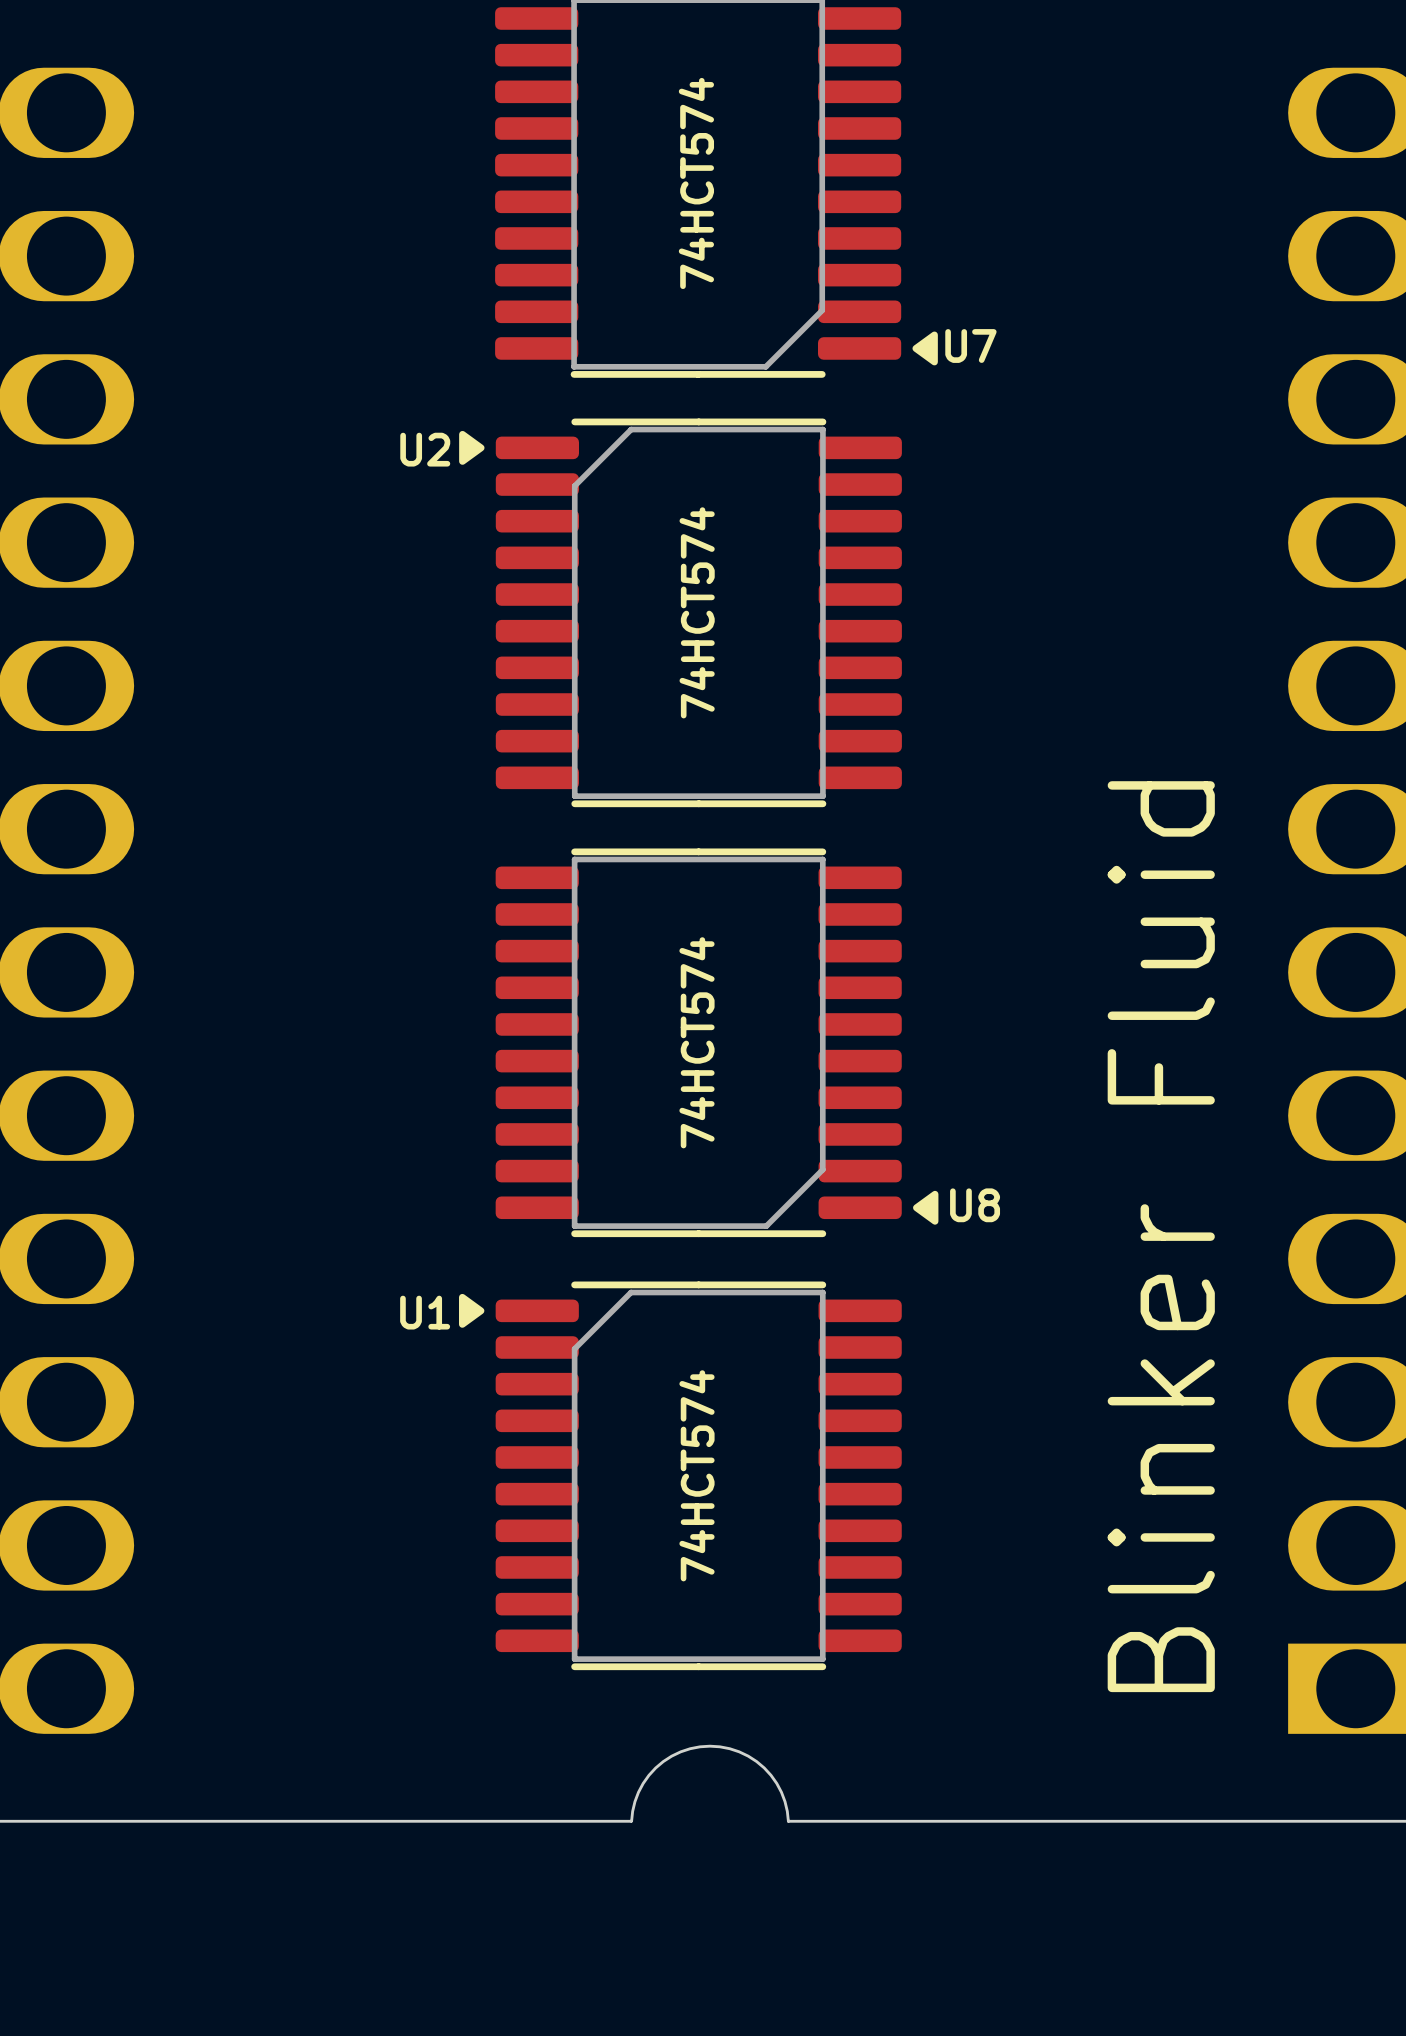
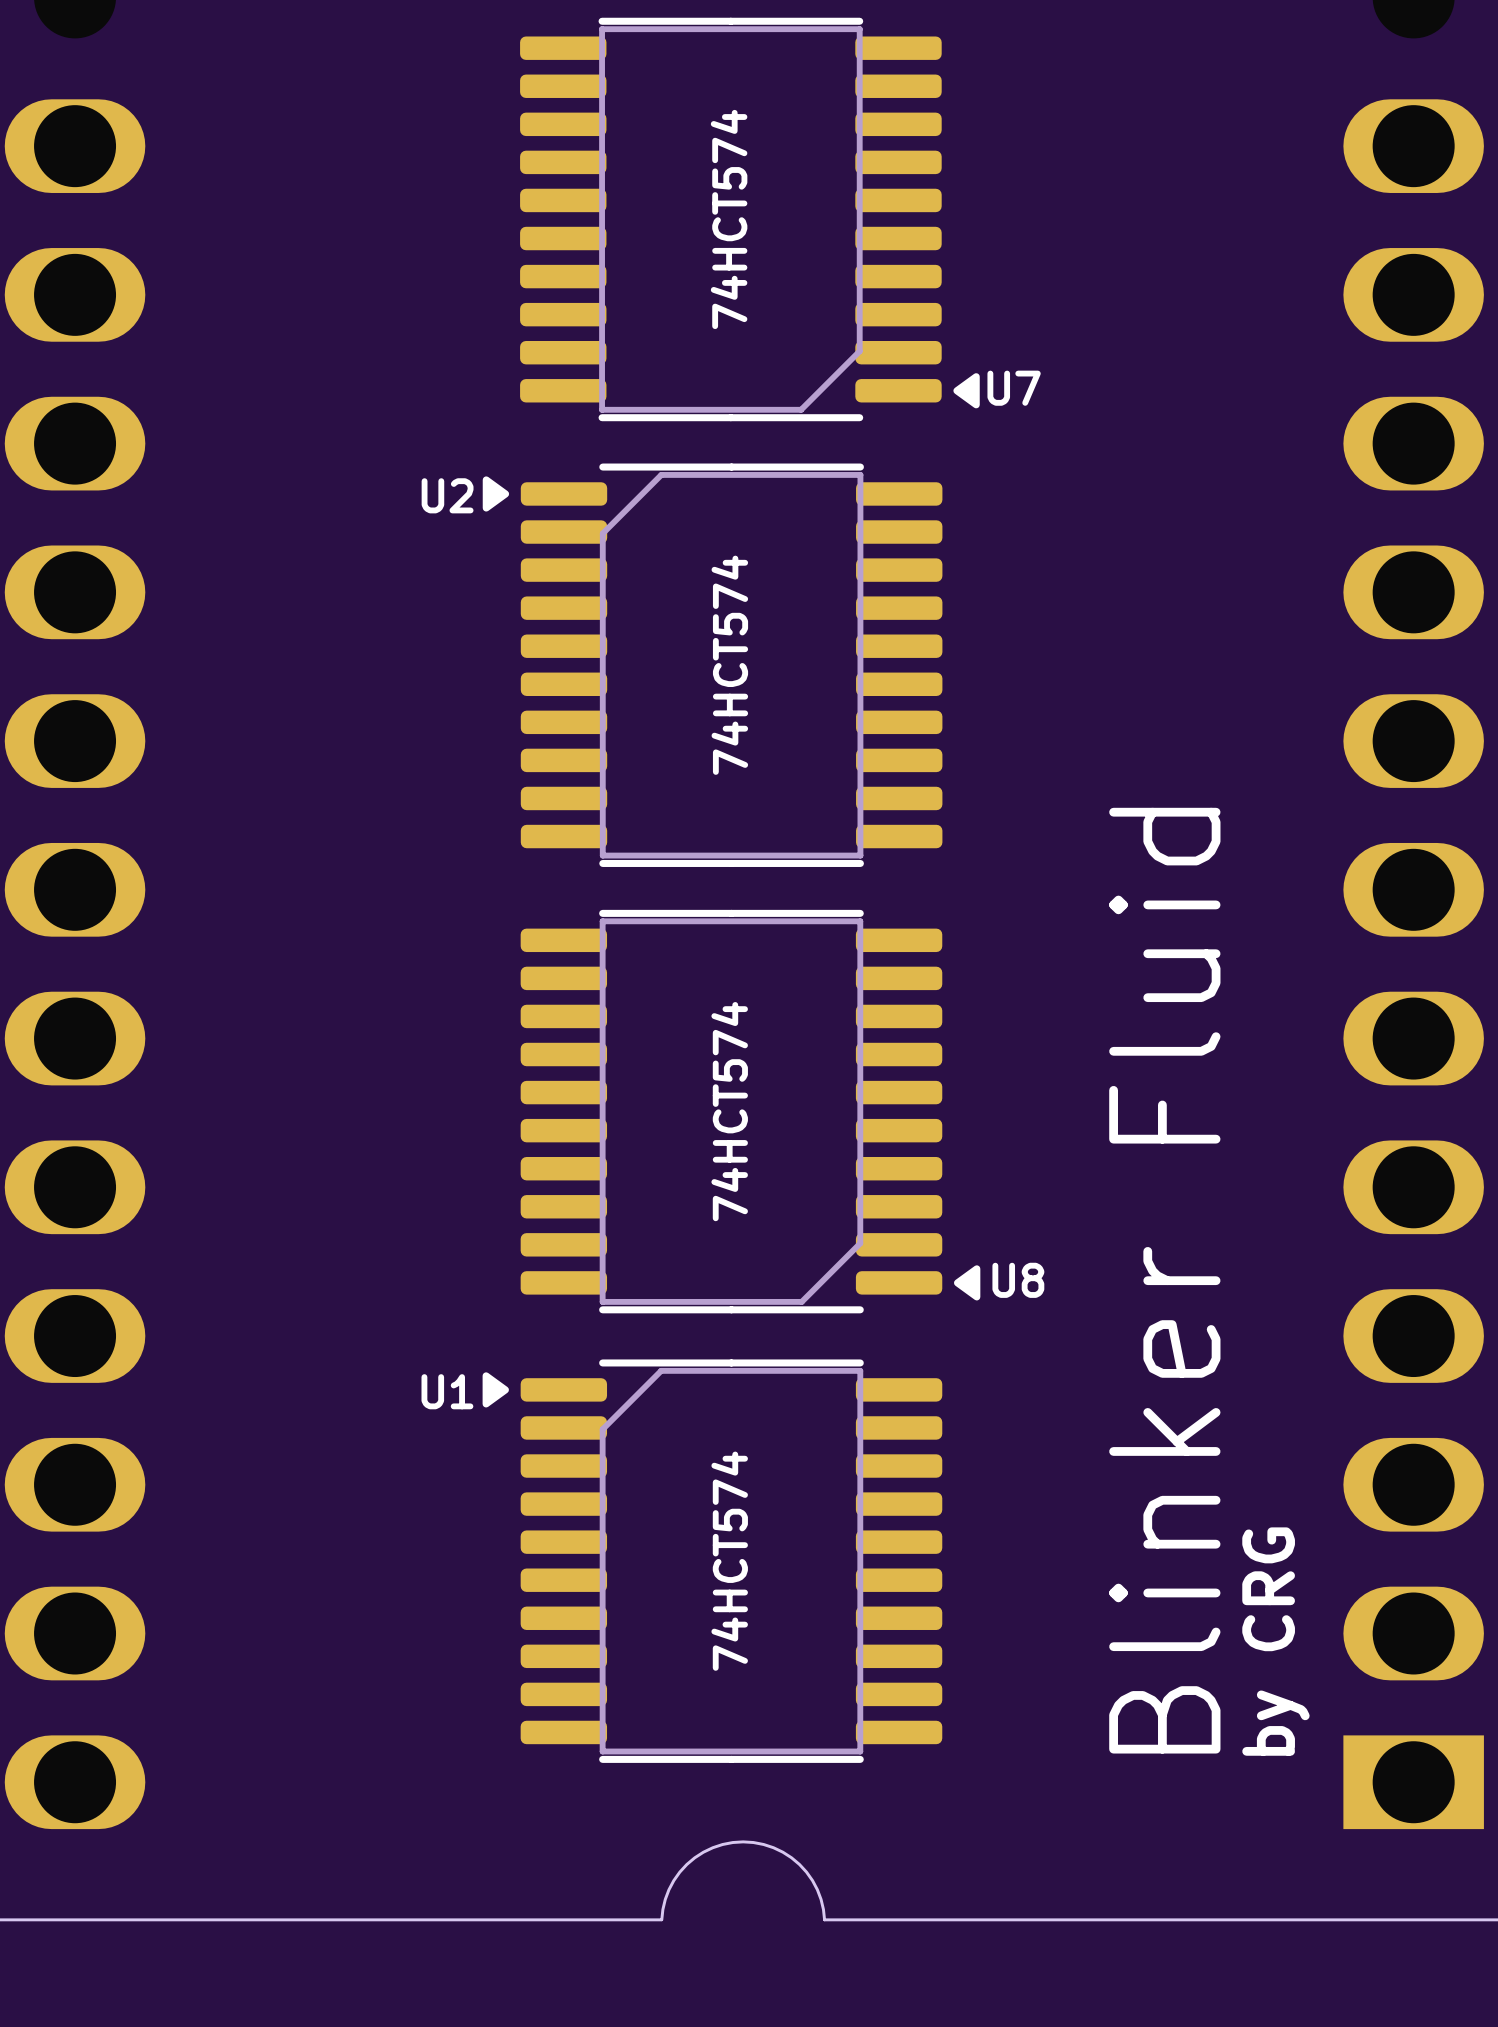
text position: Blinker Fluid (1161, 1236) -> Blinker Fluid (1164, 1280)
text: none -> by CRG (1275, 1641)

